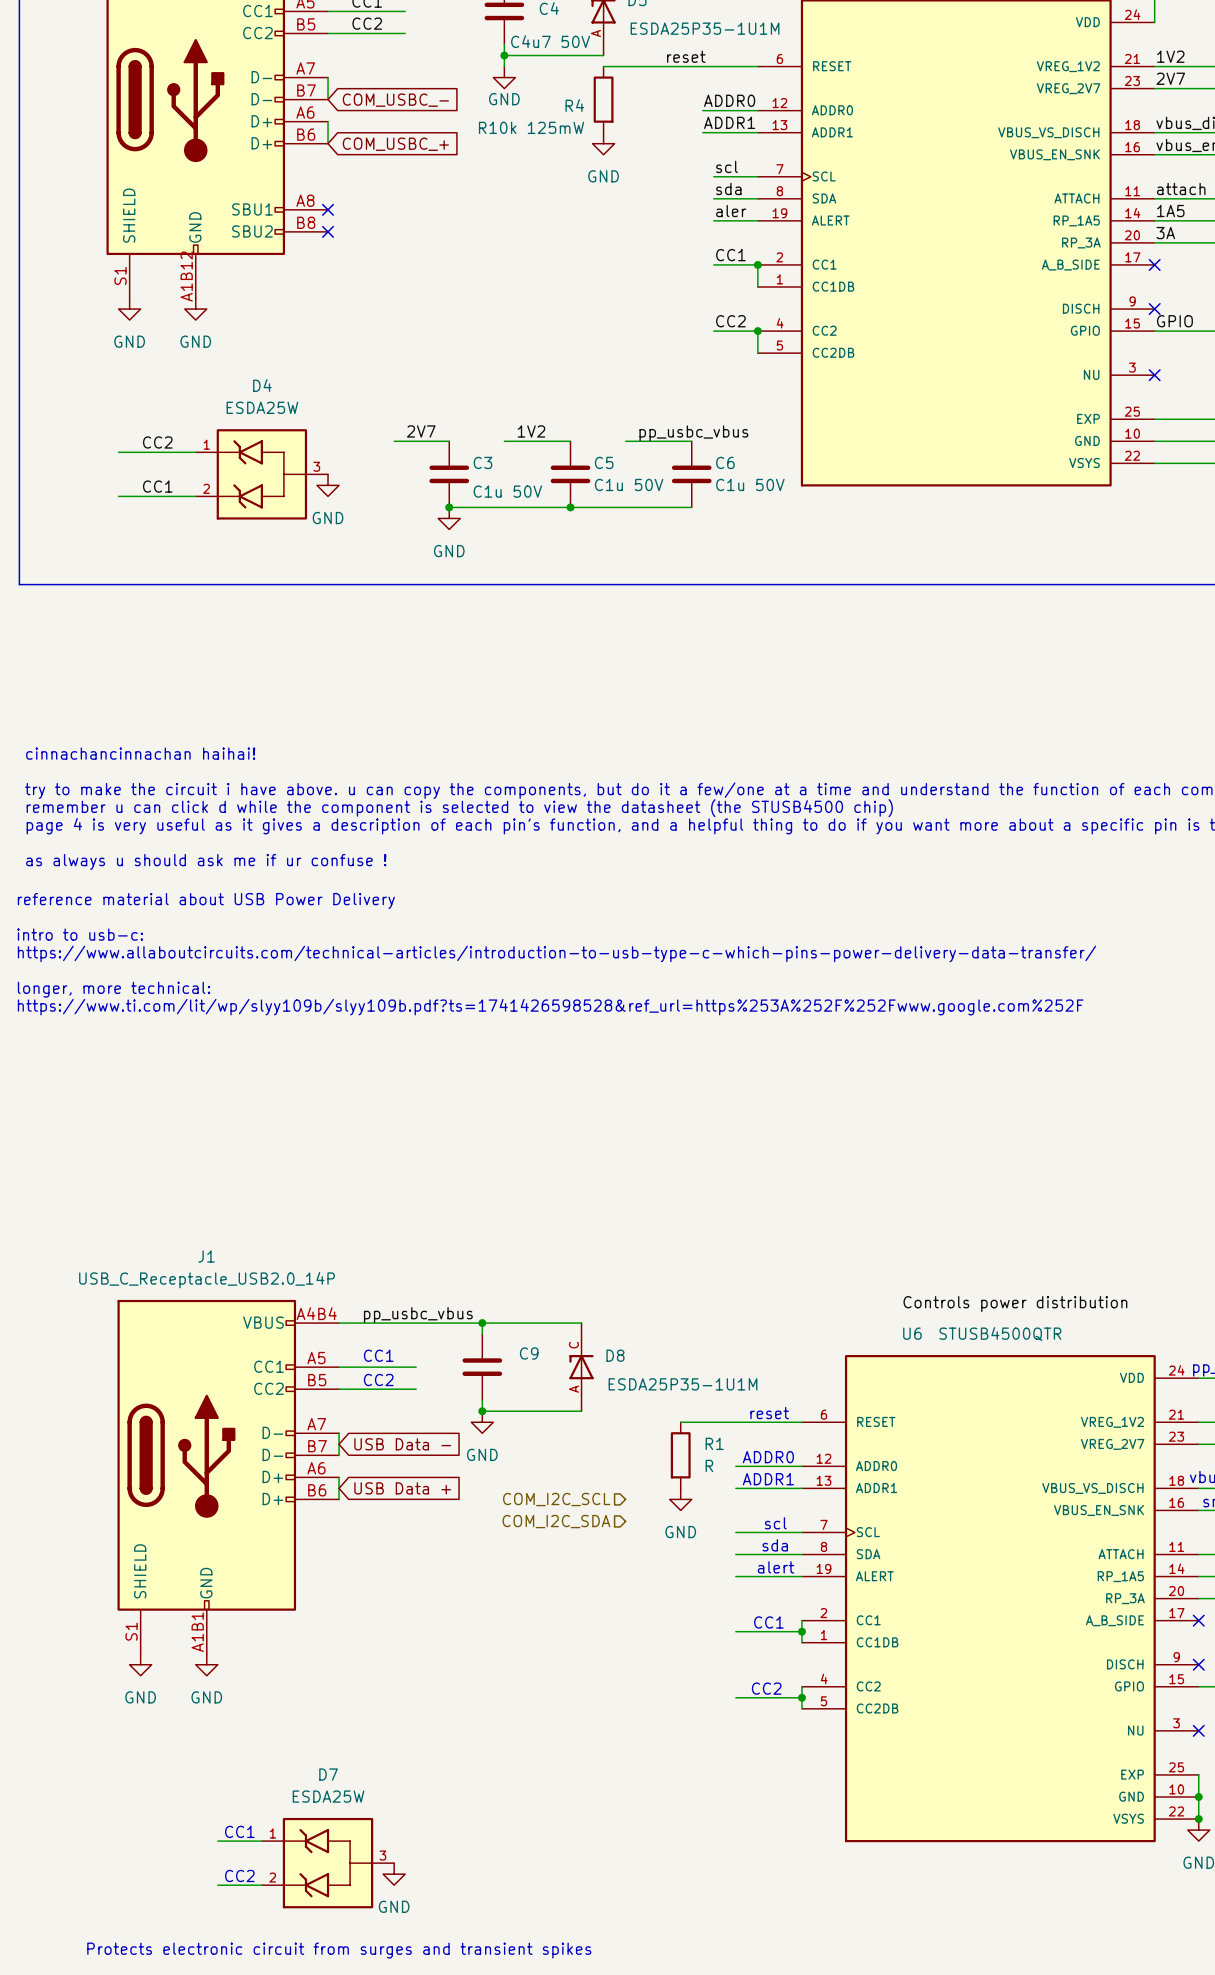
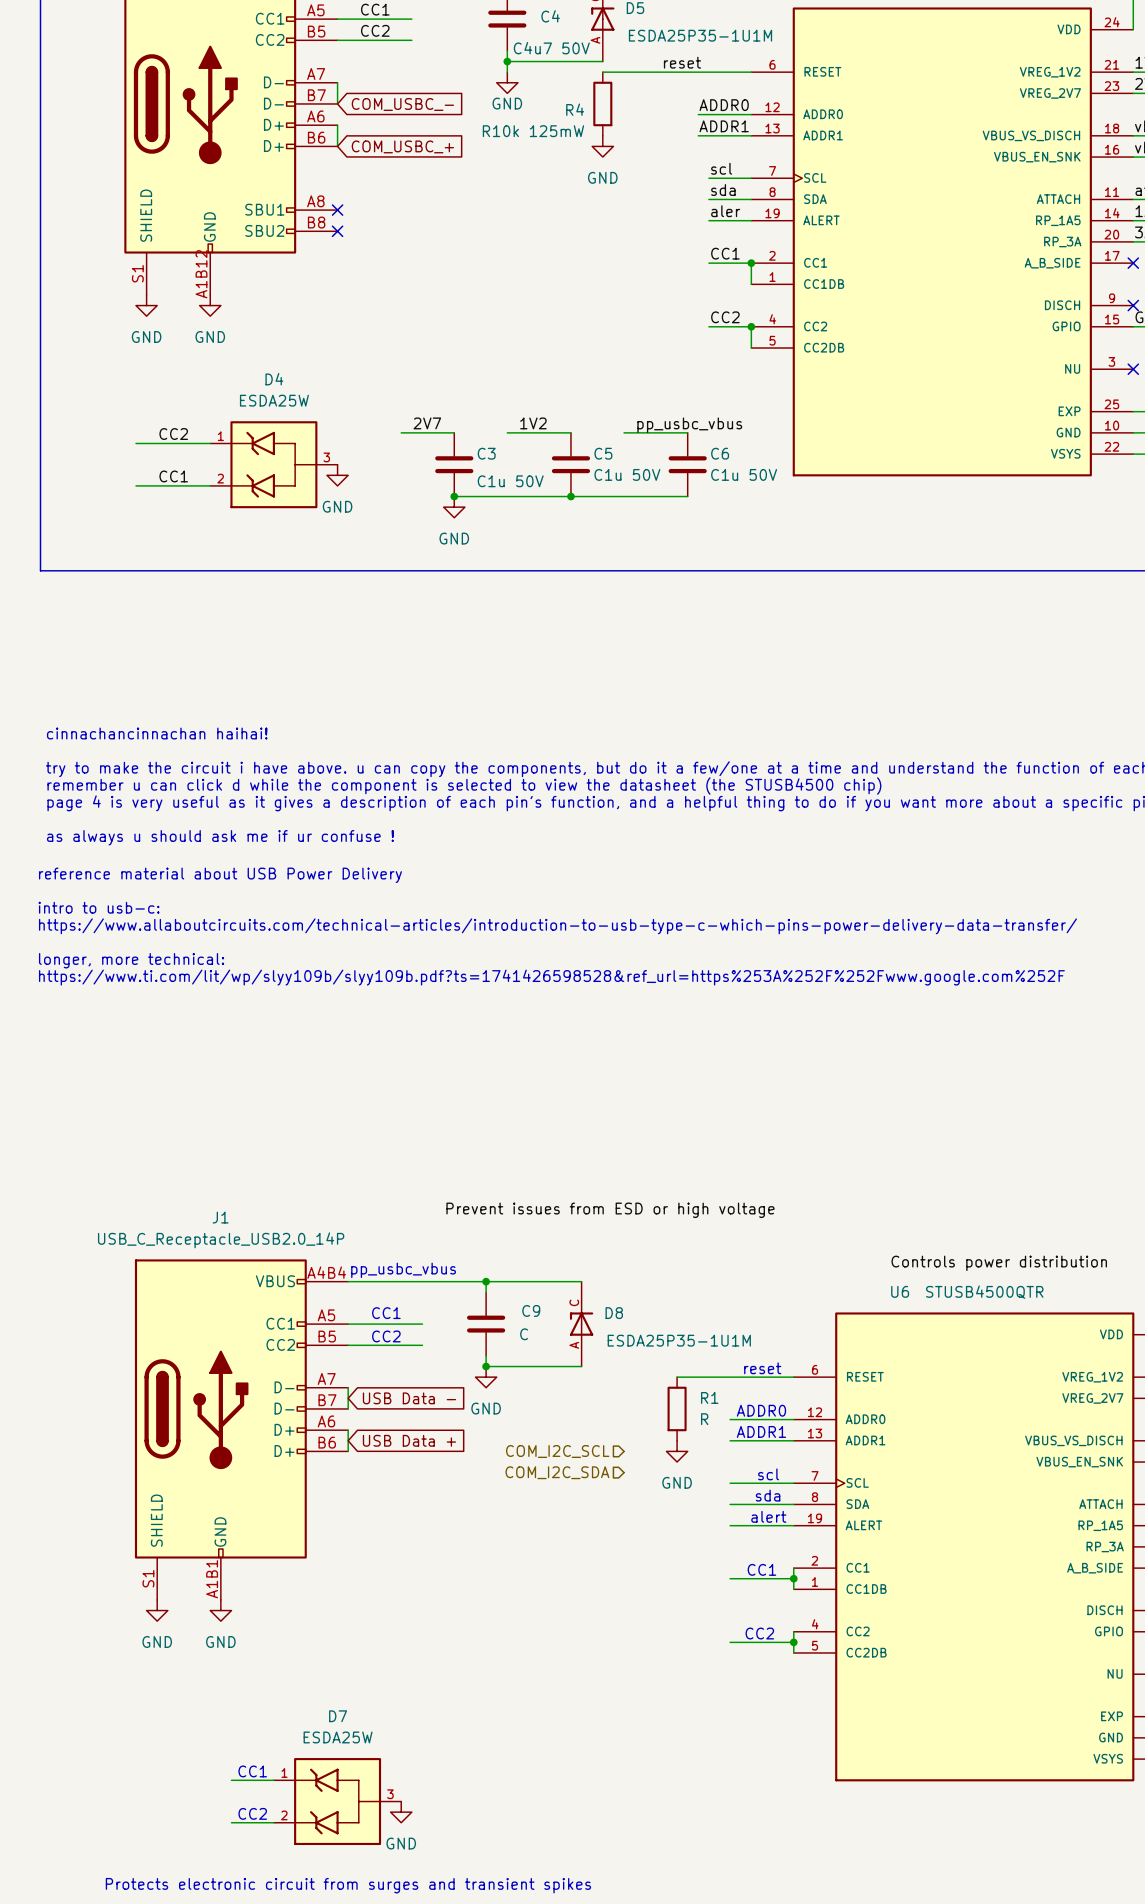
label: none -> Prevent issues from ESD or high voltage (610, 1210)
text: none -> pp_usbc_vbus (403, 1270)
label: pp_usbc_vbus (418, 1315) -> none
C9 value: none -> C (524, 1334)

